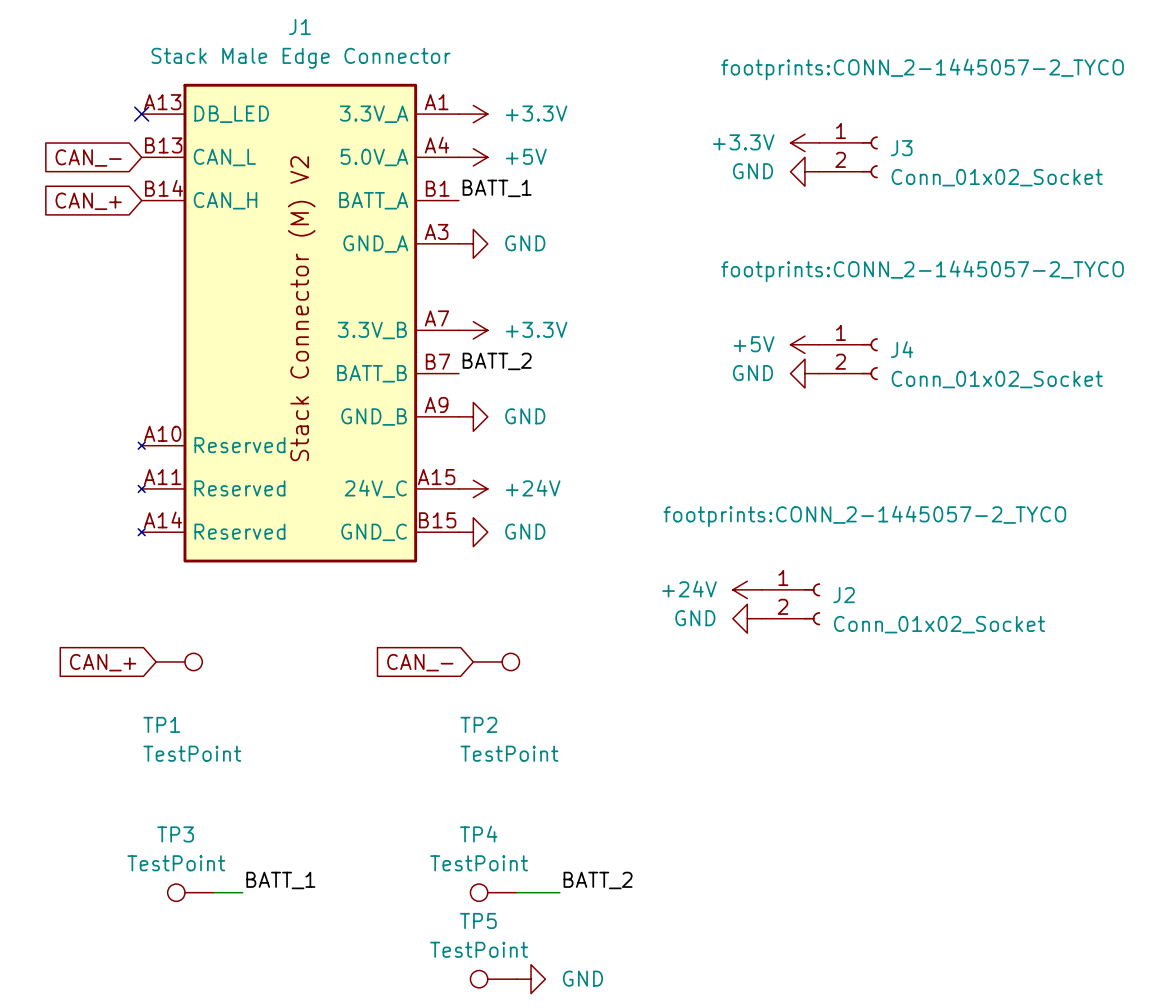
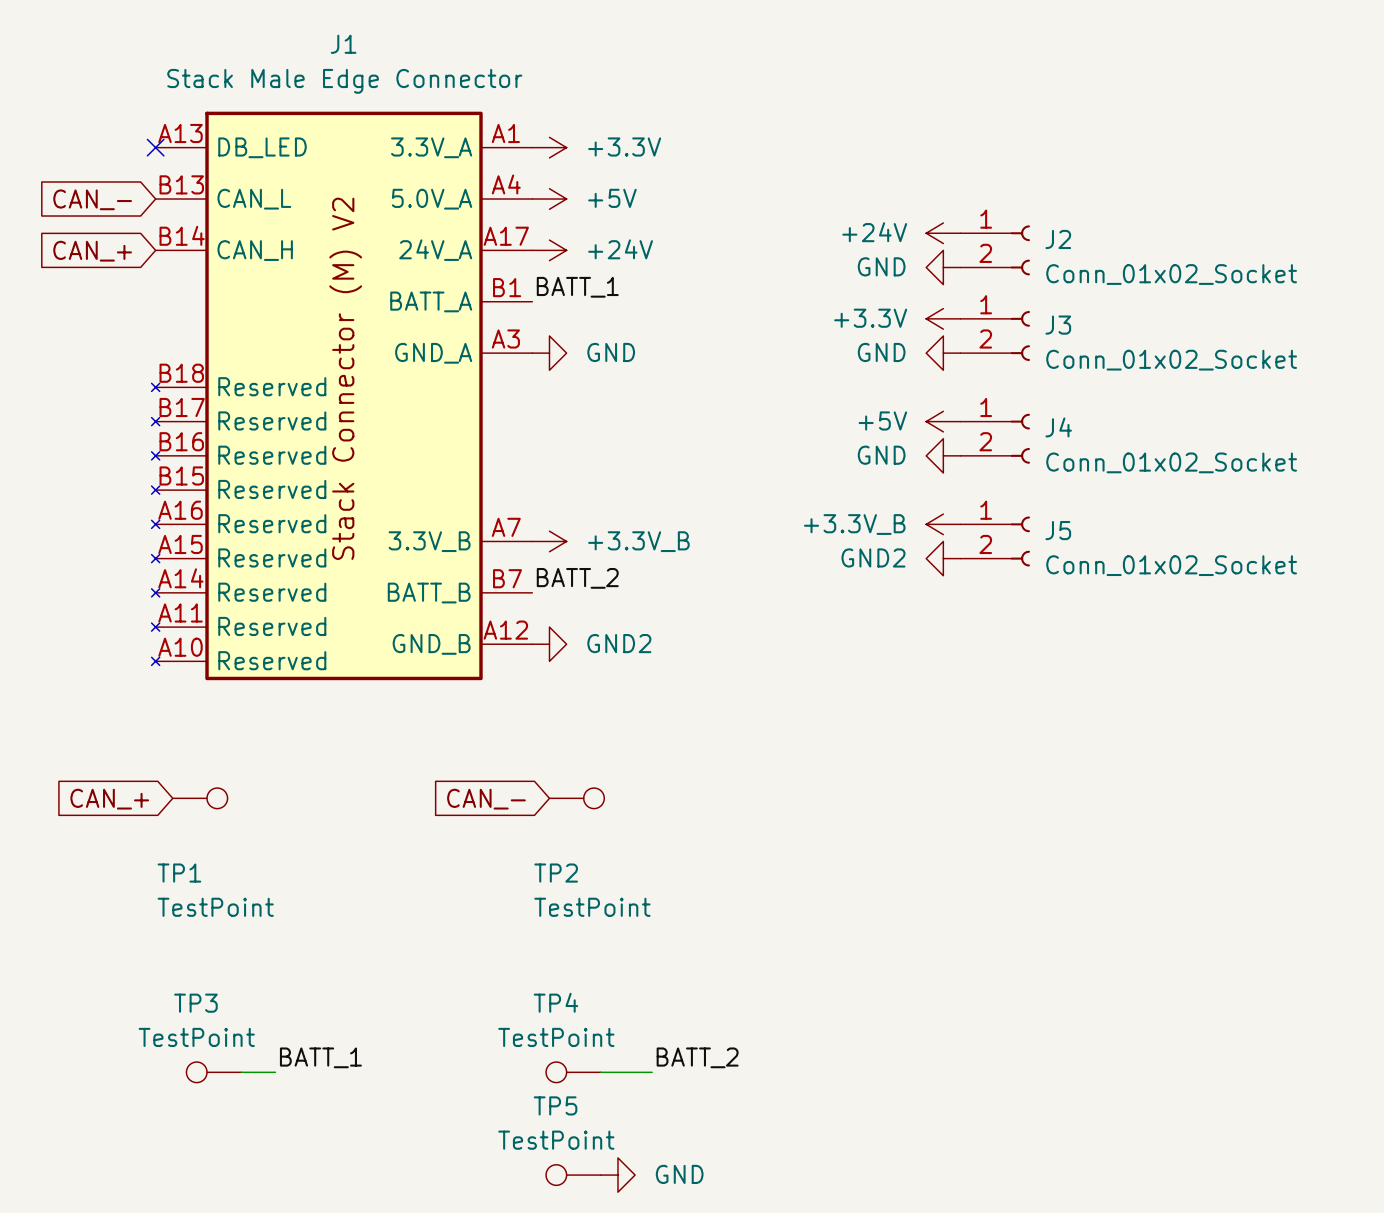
J3 text: footprints:CONN_2-1445057-2_TYCO (922, 69) -> none
J1 symbol: [138, 83, 459, 563] -> [151, 111, 533, 681]
power symbol position: +3.3V (804, 142) -> +3.3V (943, 318)
J3 position: (848, 157) -> (995, 335)
power symbol position: GND (804, 171) -> GND (943, 267)
power symbol: none -> +24V (943, 233)
label position: BATT_1 (497, 188) -> BATT_1 (577, 287)
power symbol: none -> +24V (549, 250)
power symbol position: GND (473, 243) -> GND (549, 353)
J4 text: footprints:CONN_2-1445057-2_TYCO (922, 271) -> none
power symbol: none -> GND (943, 353)
power symbol: +3.3V (473, 330) -> none
label position: BATT_2 (497, 361) -> BATT_2 (577, 578)
power symbol: GND (473, 416) -> none
power symbol: none -> +3.3V_B (943, 524)
power symbol: none -> +3.3V_B (549, 541)
J5: none -> Conn_01x02_Socket (995, 541)
power symbol: none -> GND2 (943, 558)
power symbol: +24V (473, 488) -> none
J2 text: footprints:CONN_2-1445057-2_TYCO (864, 516) -> none
power symbol: GND (473, 532) -> GND2 (549, 644)
power symbol: +24V (747, 589) -> none
J2 position: (790, 604) -> (995, 250)
power symbol: GND (747, 618) -> none

